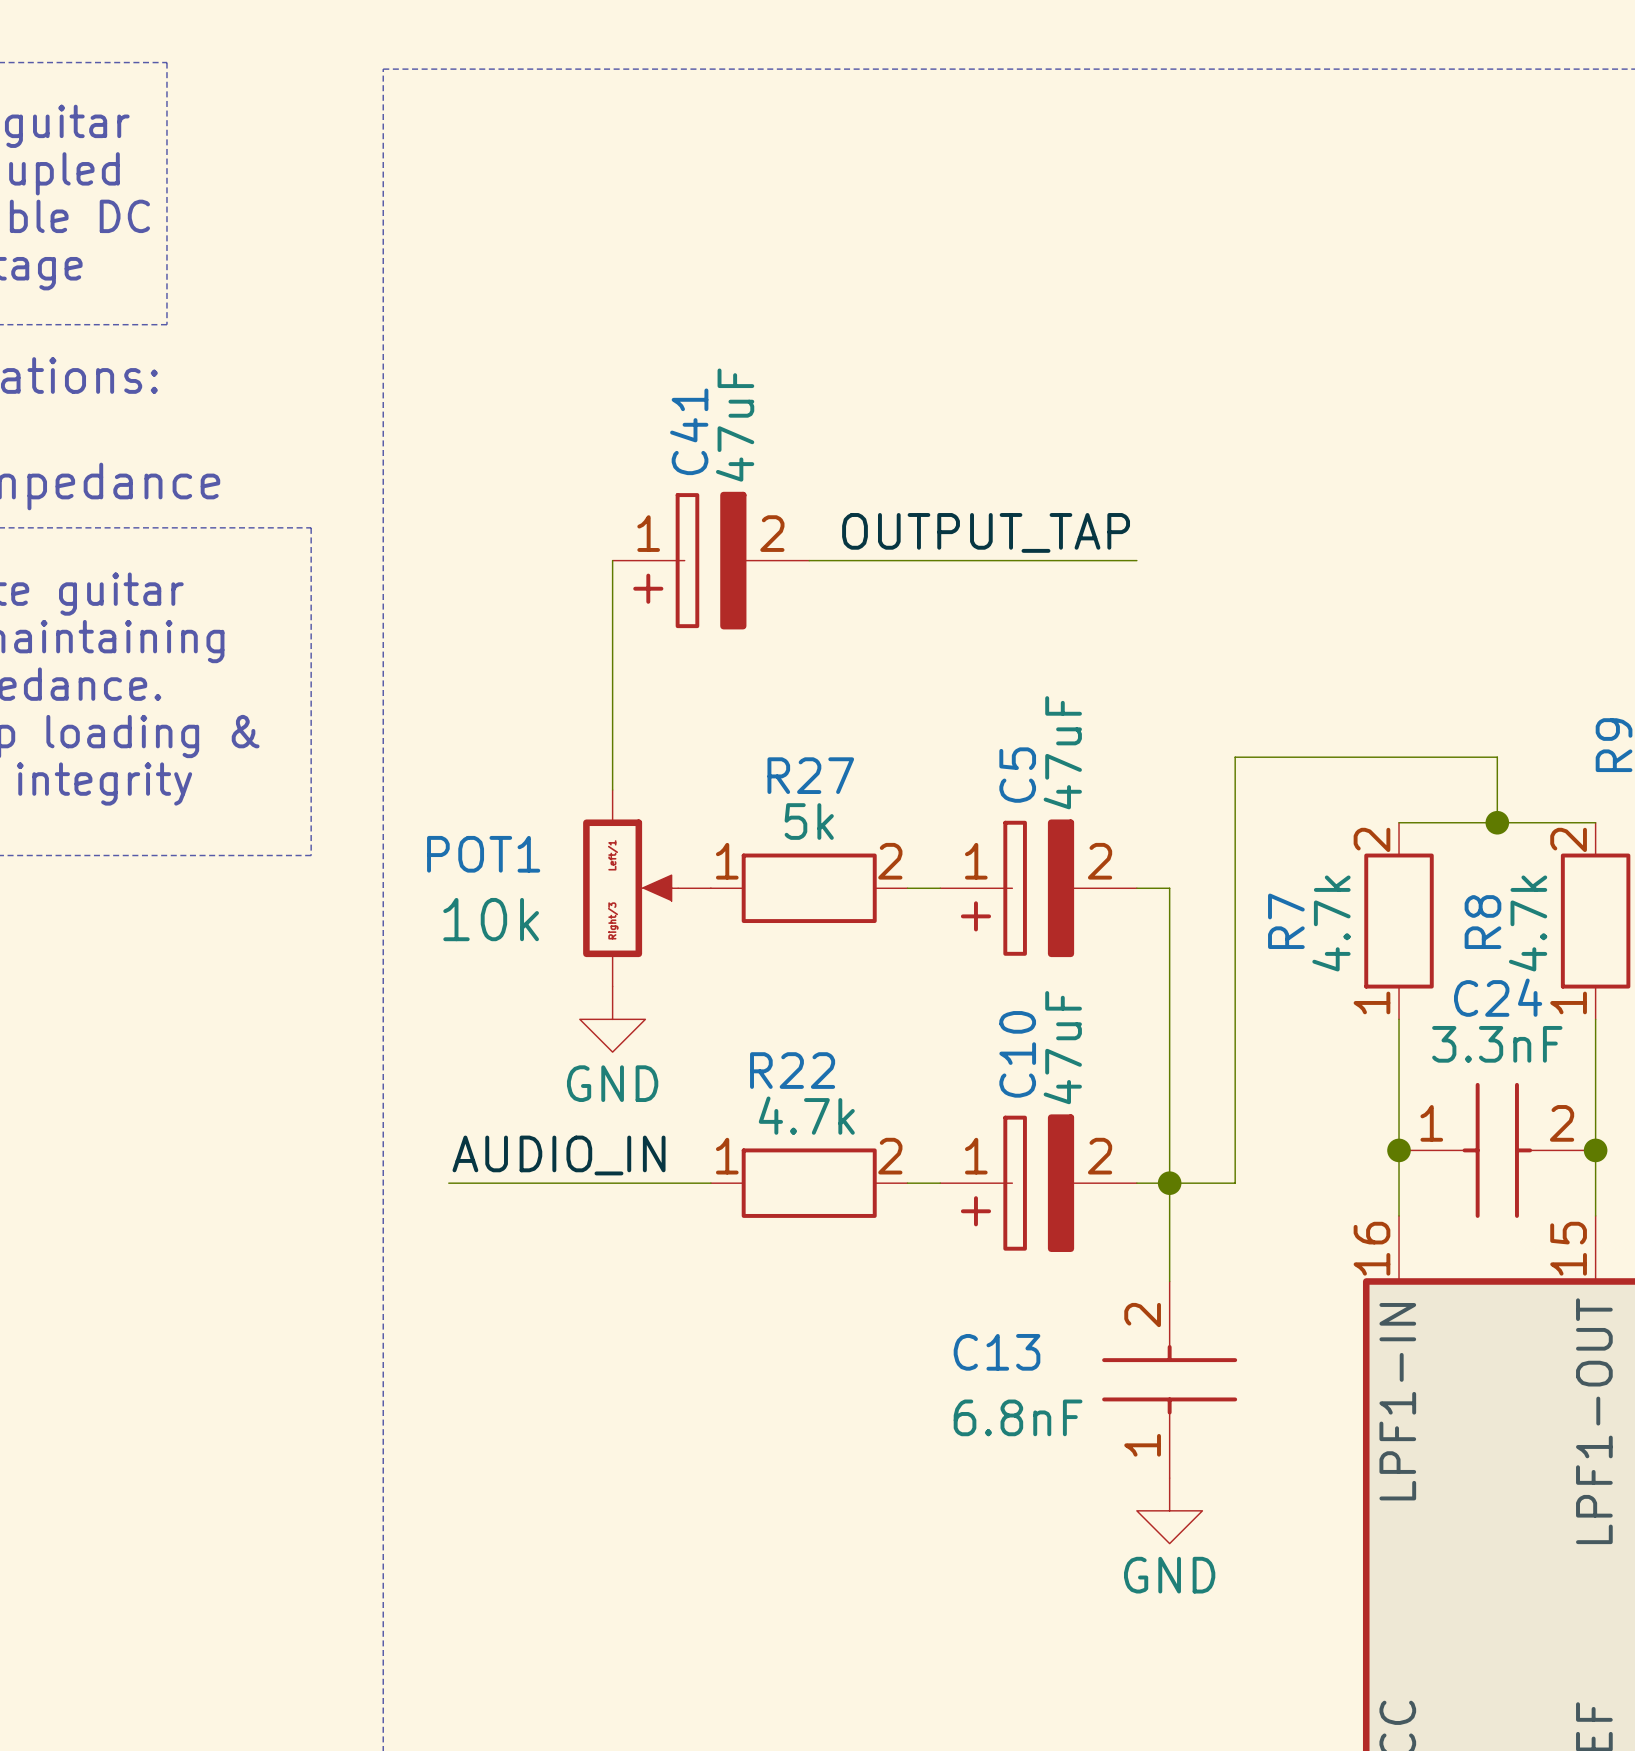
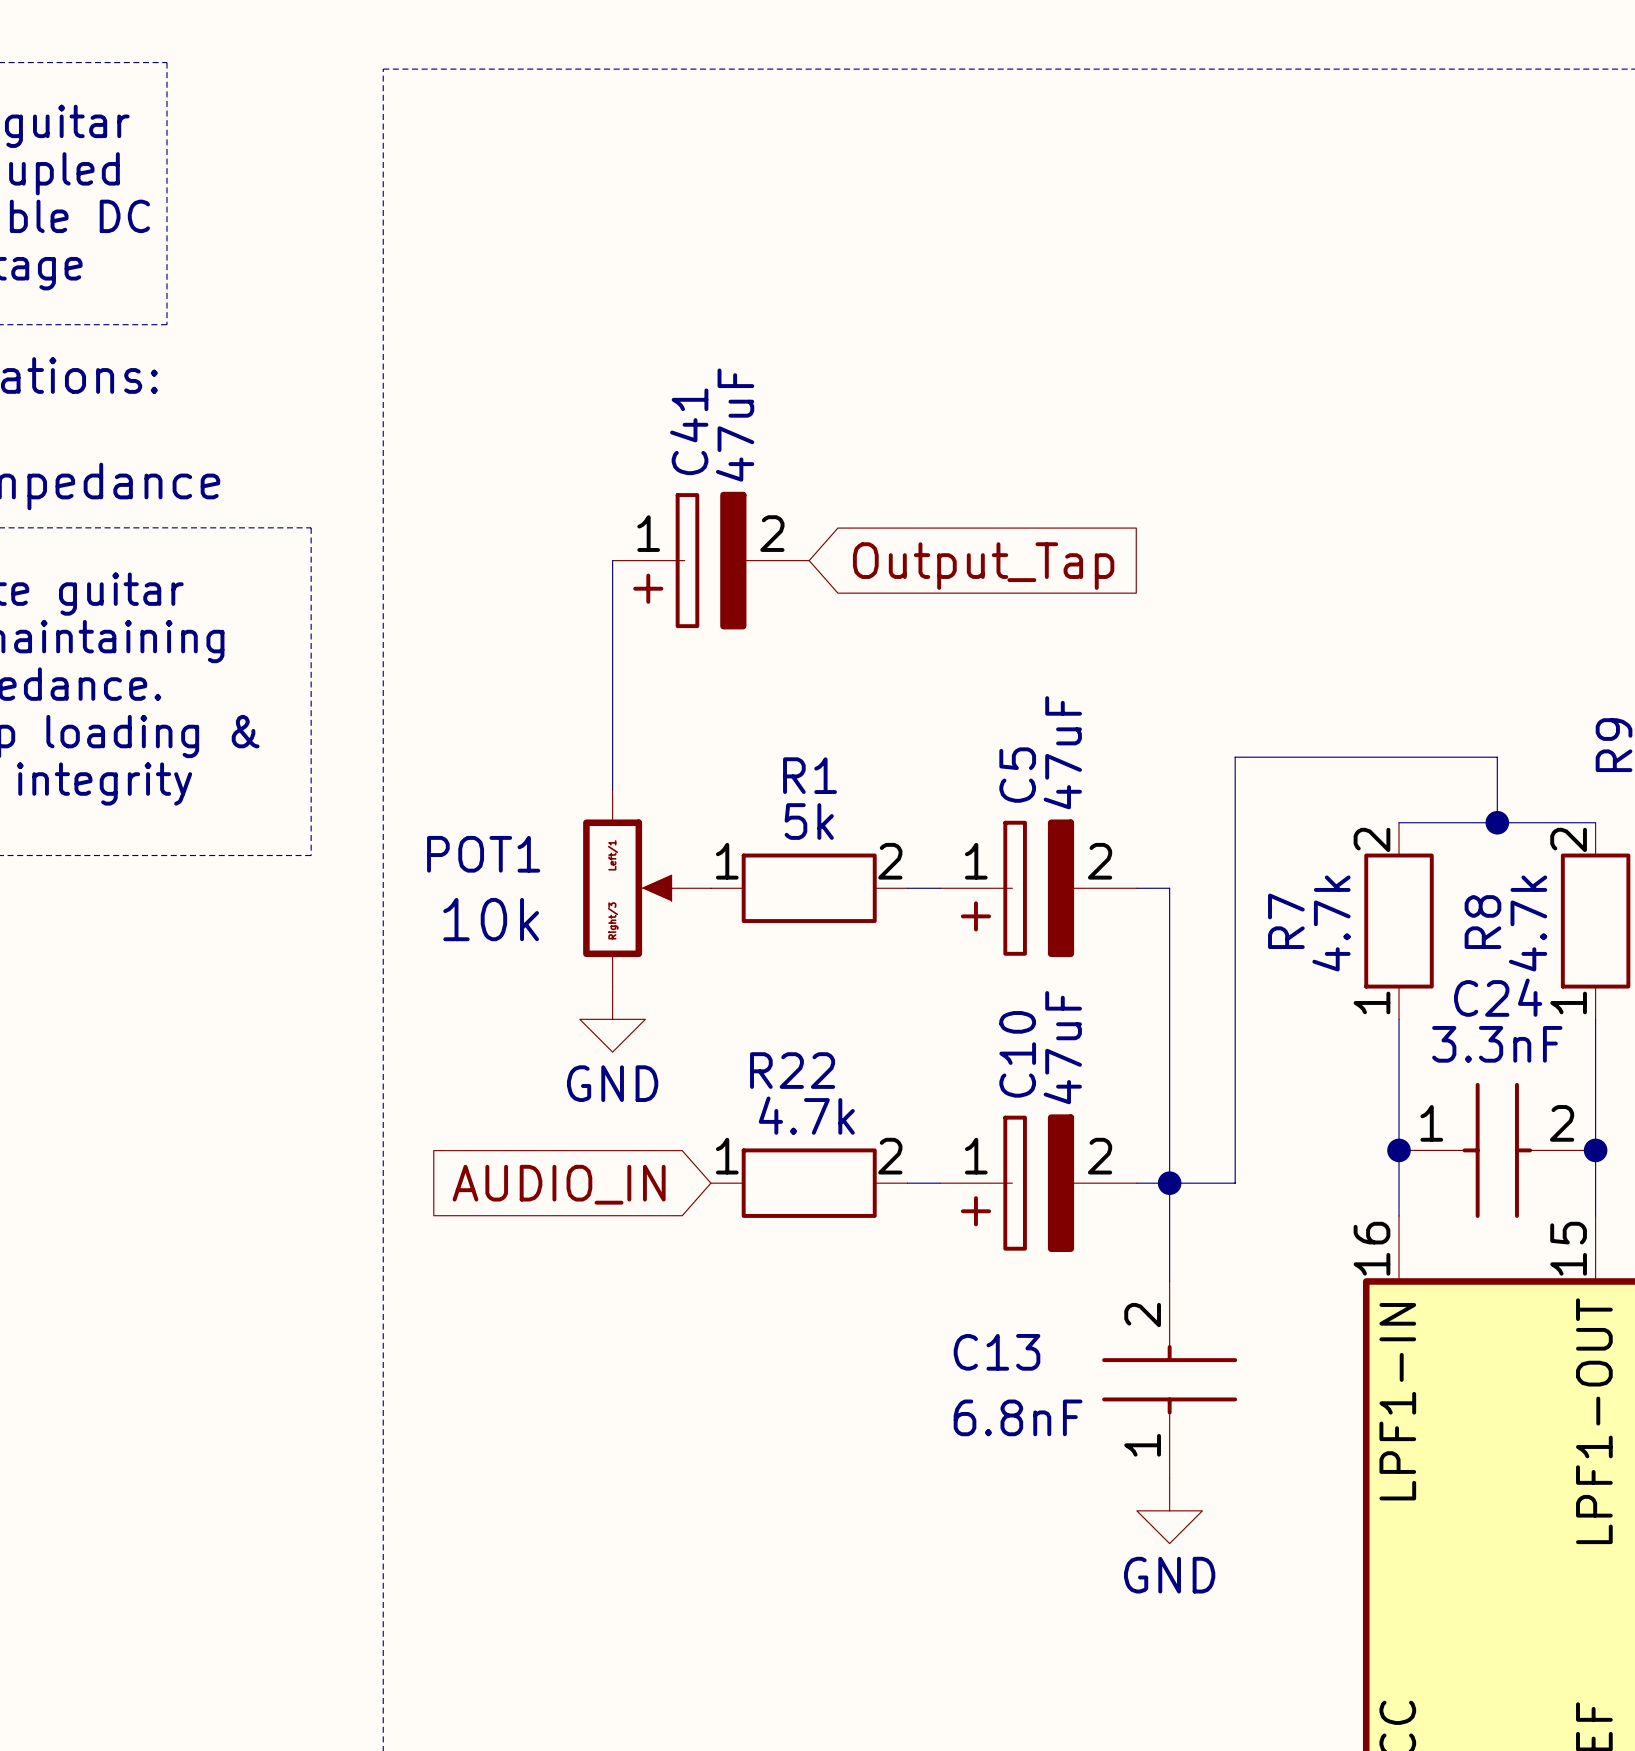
label: OUTPUT_TAP (986, 532) -> none
wire: (809, 560) (1136, 560) -> none
global label: none -> Output_Tap (983, 566)
R27 name: R27 (810, 775) -> R1 (809, 775)
label: AUDIO_IN (559, 1155) -> none
wire: (448, 1183) (710, 1183) -> none
global label: none -> AUDIO_IN (559, 1184)

